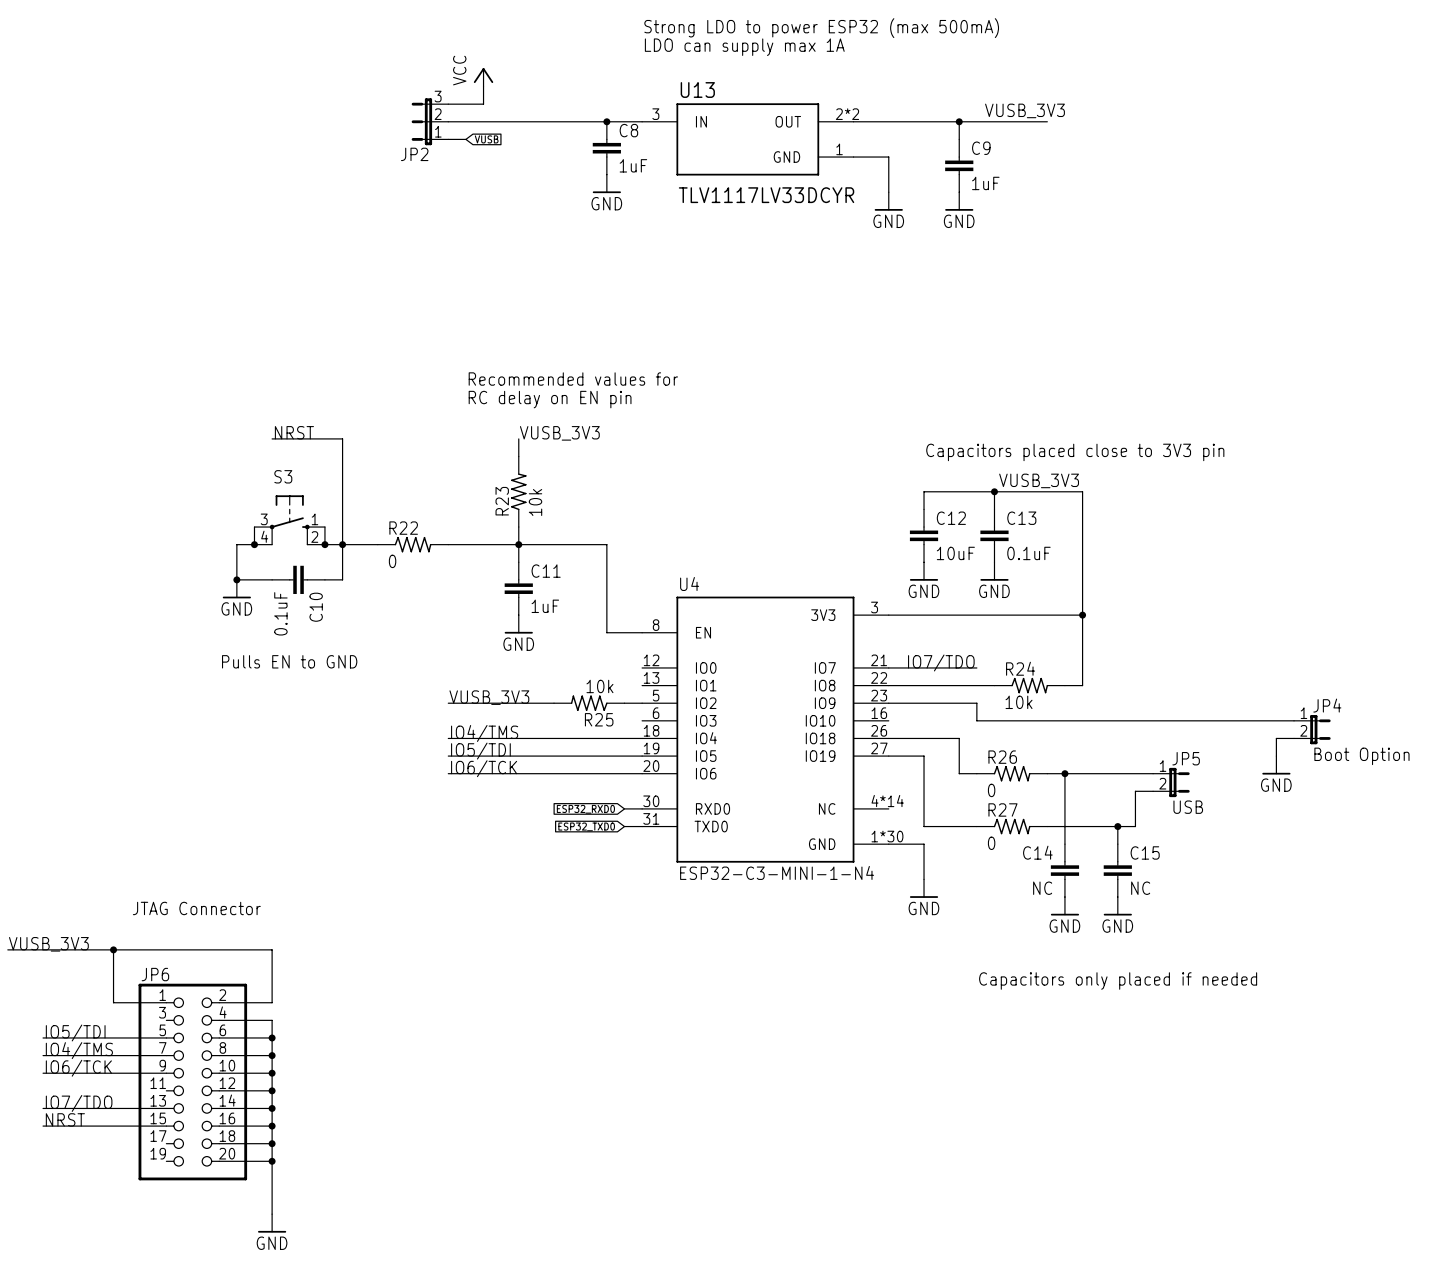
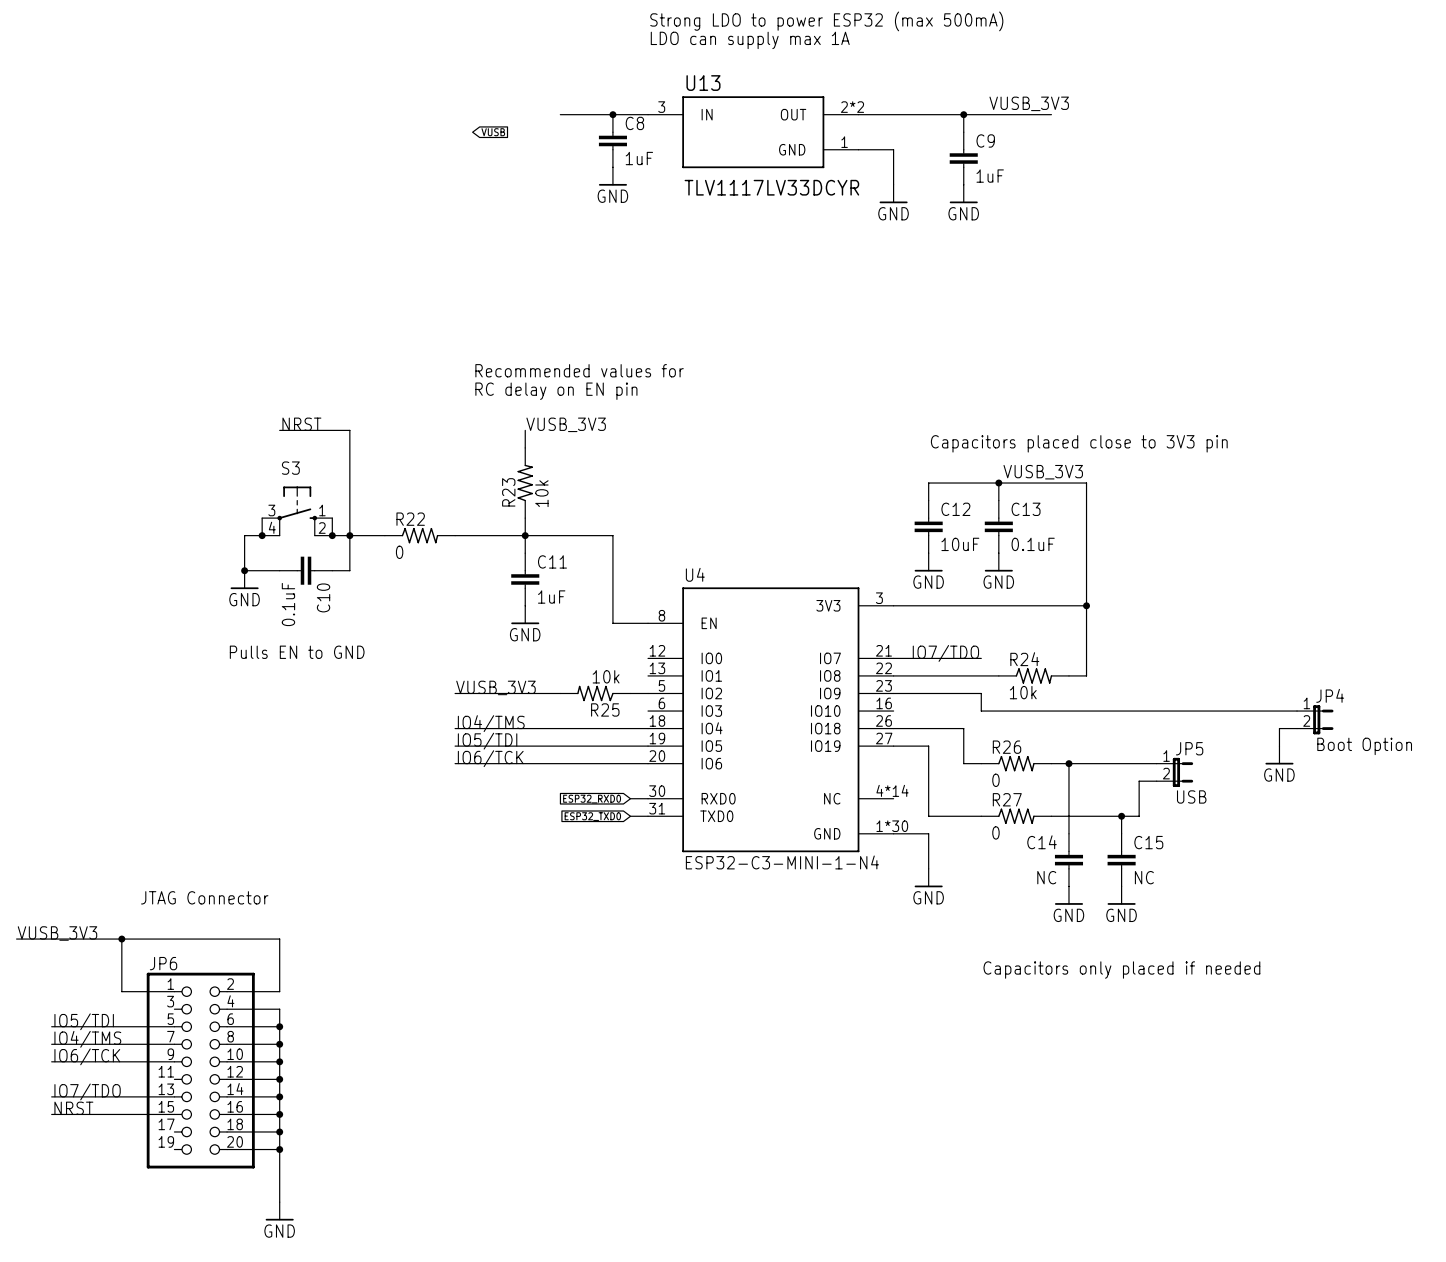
power symbol: VCC (483, 77) -> none
wire: (483, 86) (483, 104) (448, 104) -> none
JP2: (429, 121) -> none
wire: (448, 121) (554, 121) -> none
wire: (448, 139) (465, 139) -> none

